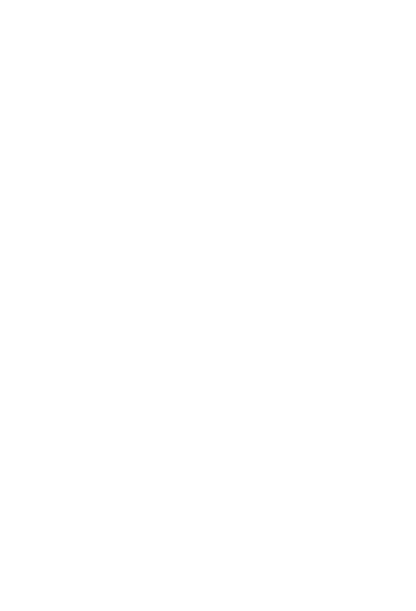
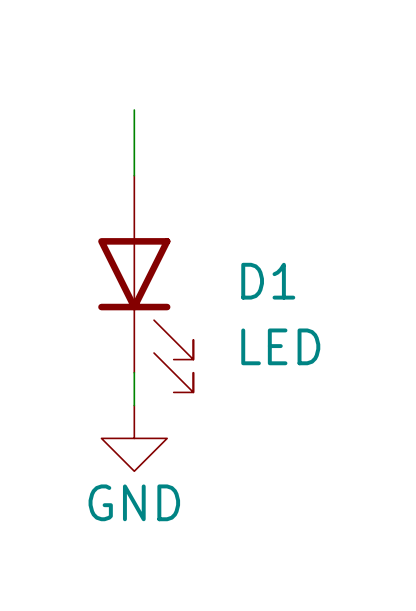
wire: none -> (134, 110) (134, 175)
D1: none -> LED (145, 284)
wire: none -> (134, 372) (134, 405)
power symbol: none -> GND (134, 438)

